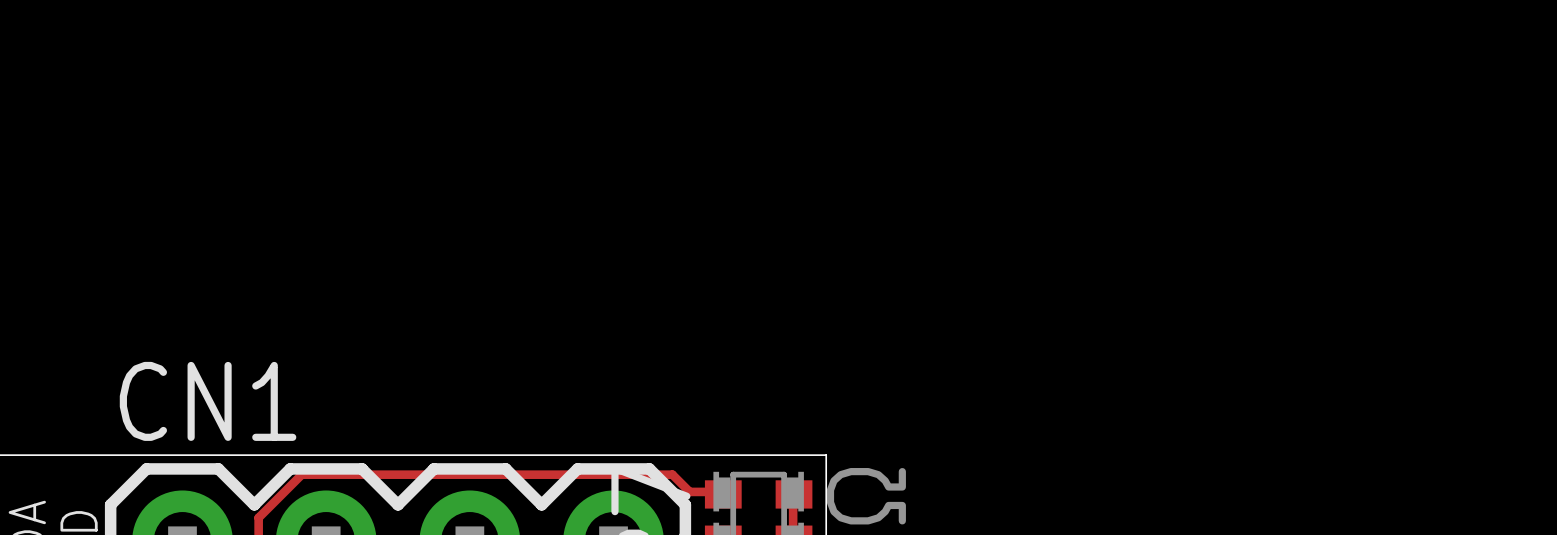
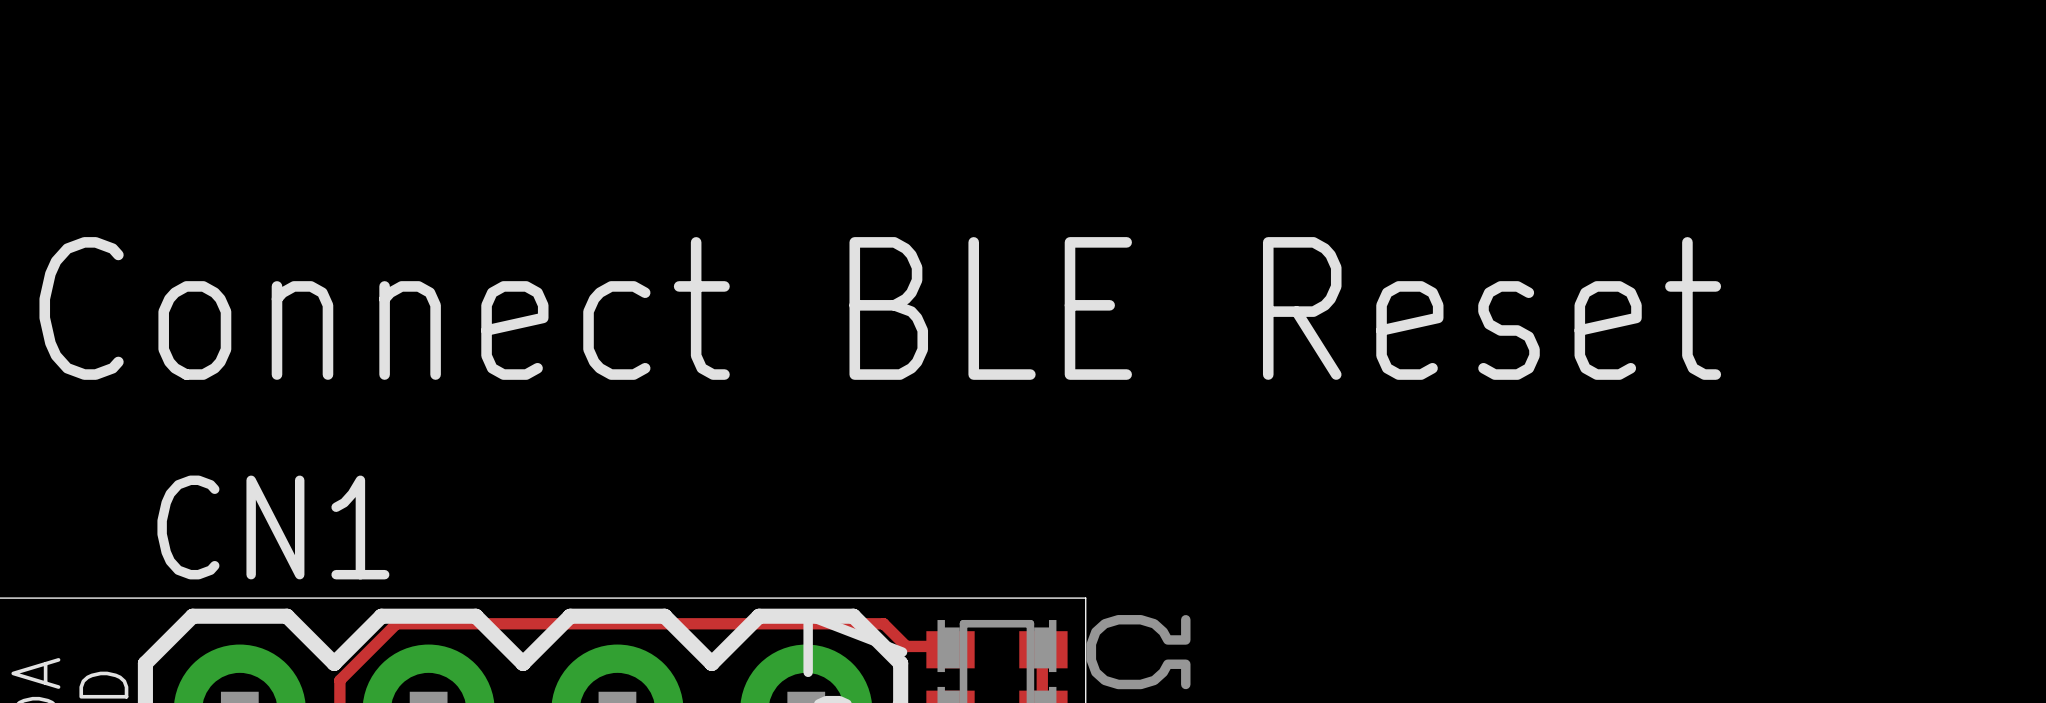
text: none -> Connect BLE Reset (880, 308)

